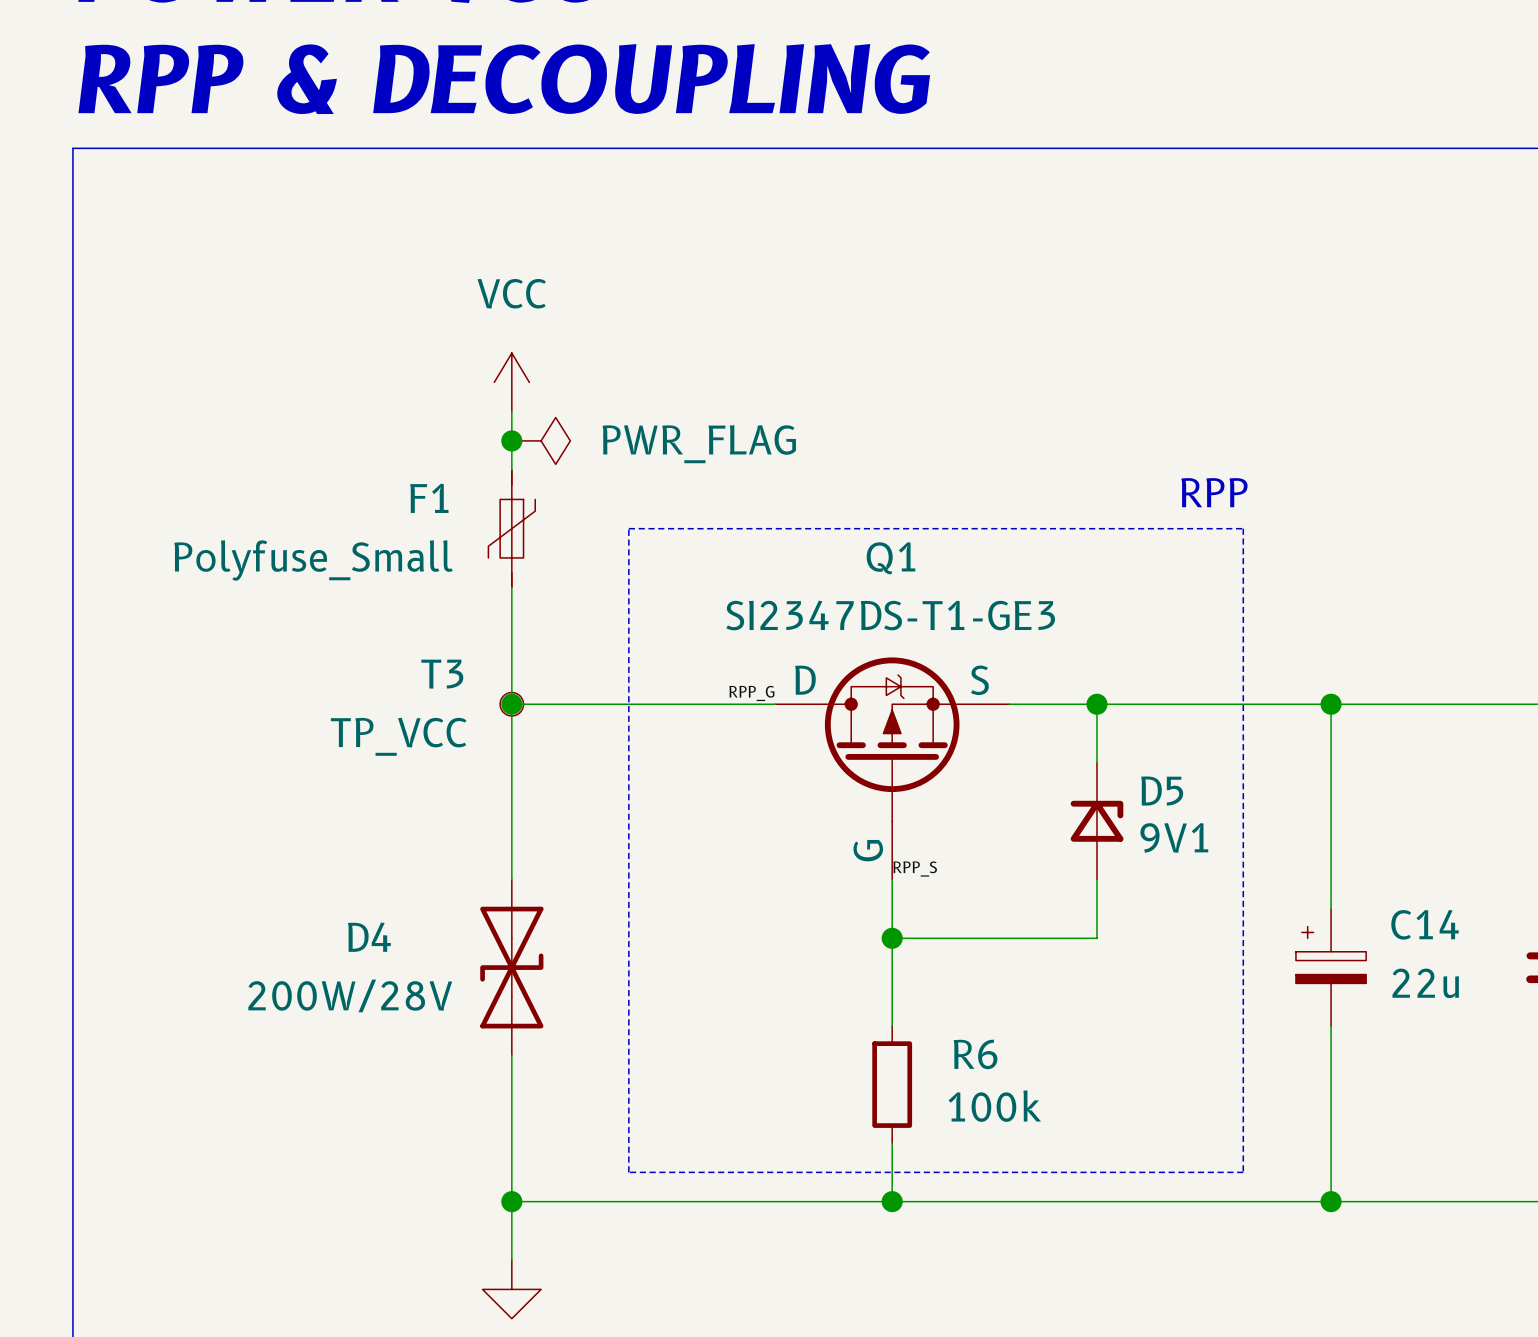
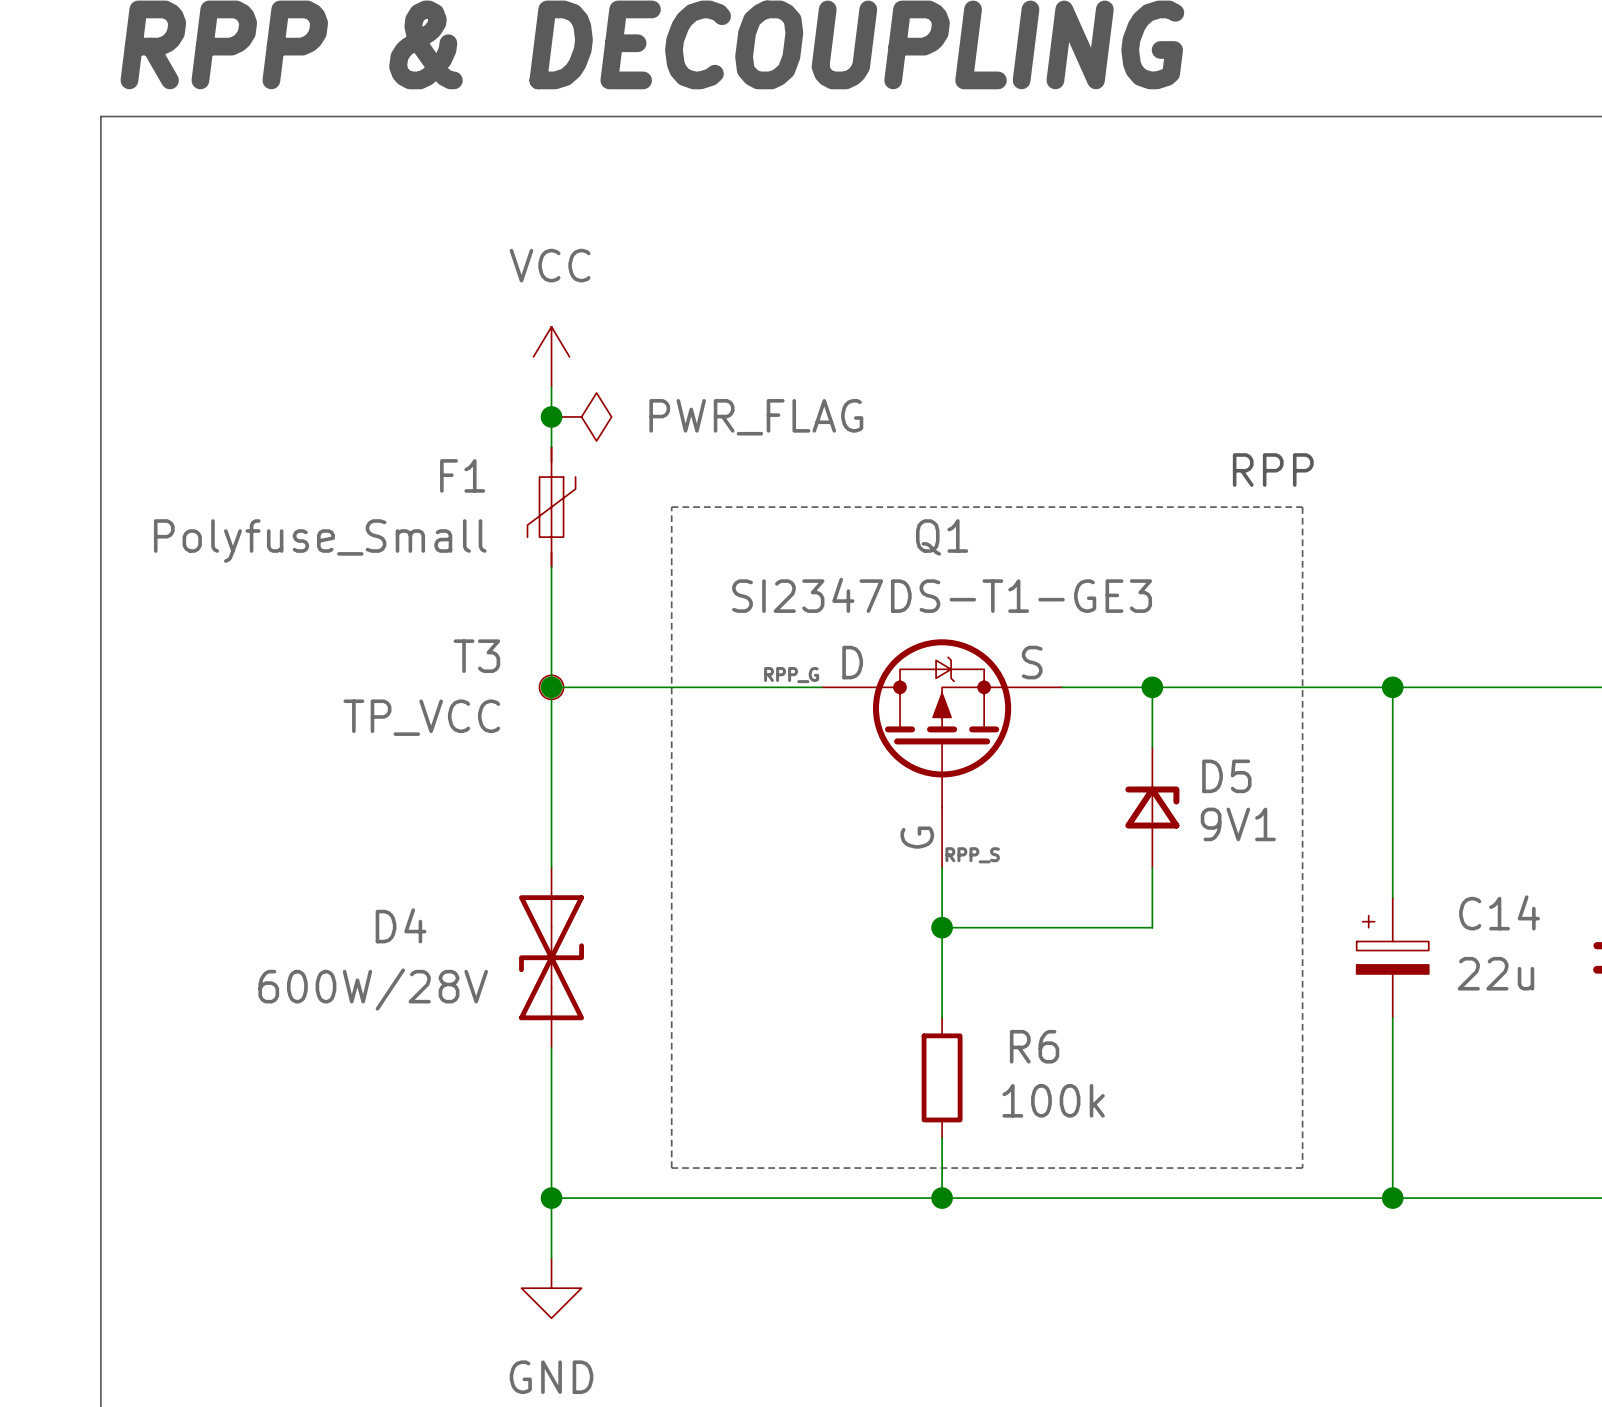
D4 value: 200W/28V (350, 995) -> 600W/28V (373, 989)

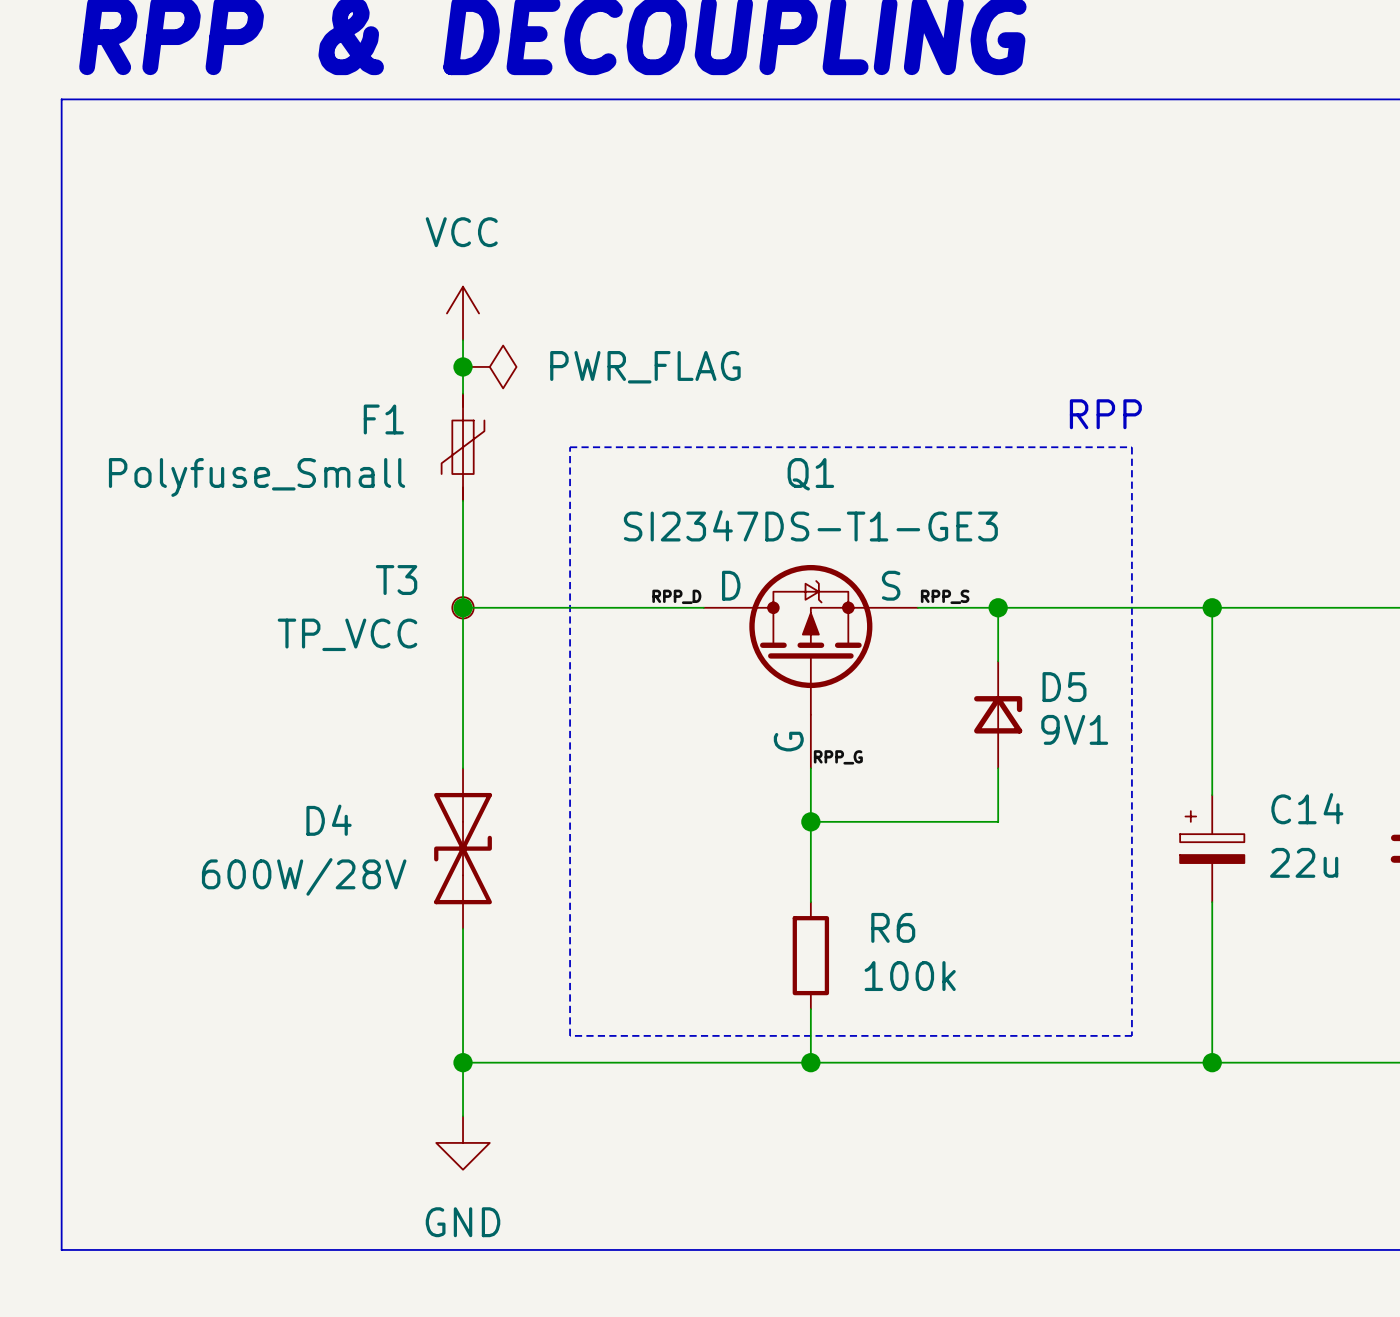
label: RPP_G (791, 675) -> RPP_D (676, 596)
label: none -> RPP_S (945, 596)
label: RPP_S (972, 855) -> RPP_G (838, 757)

